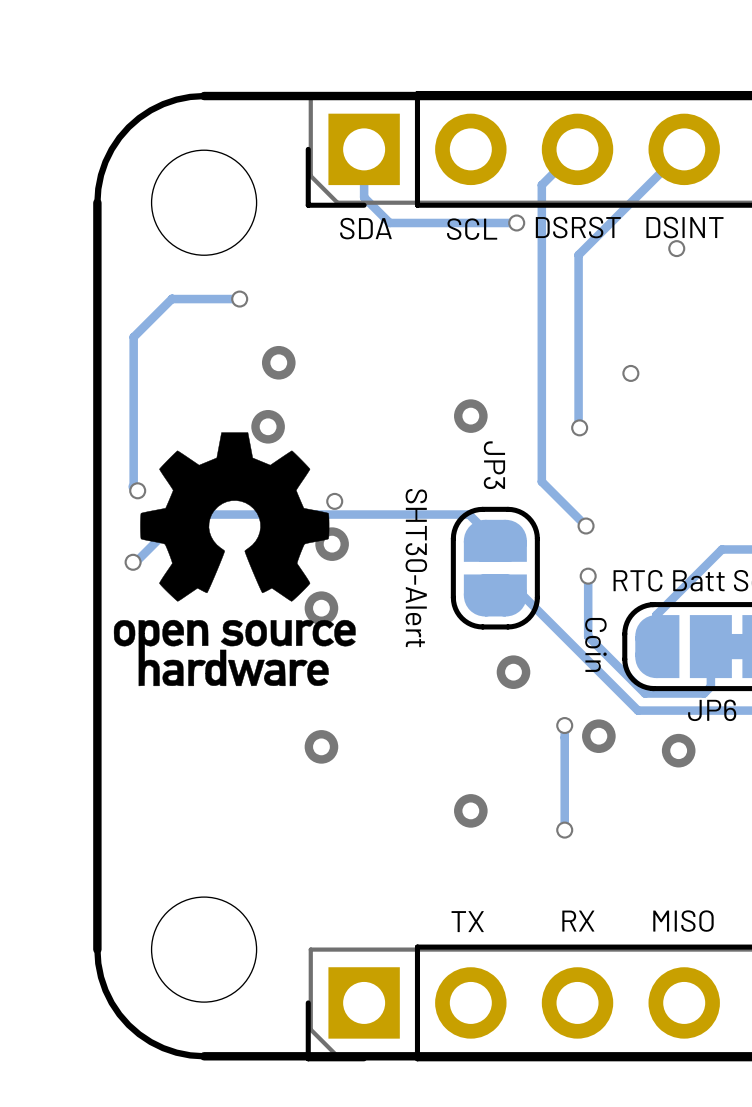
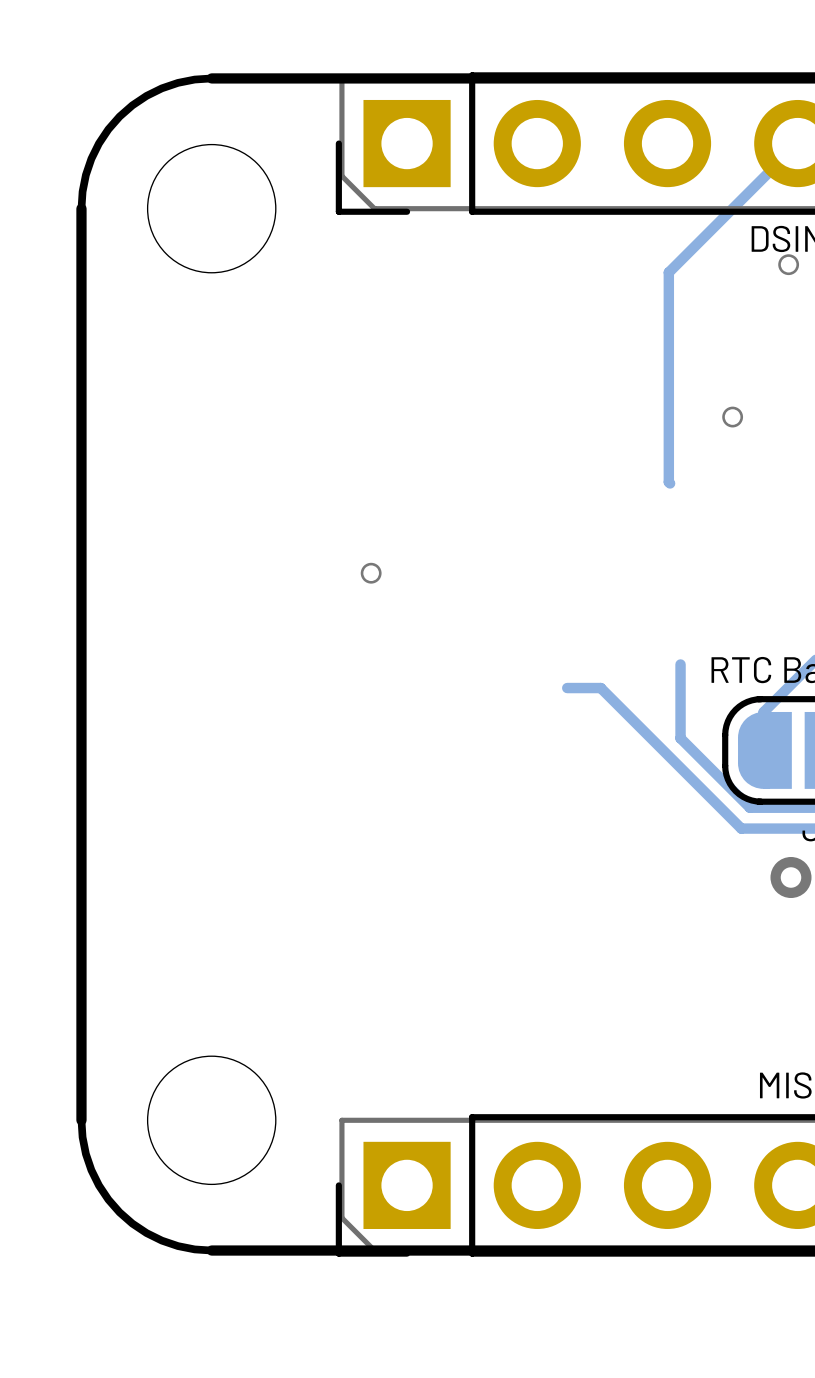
track: (364, 149) (364, 197) (389, 222) (516, 222) -> none
track: (577, 149) (541, 185) (541, 481) (586, 526) -> none
via: (516, 222) -> none
text: DSRST (578, 227) -> none
text: SDA (365, 228) -> none
text: SCL (472, 229) -> none
track: (172, 298) (133, 337) (133, 486) (137, 490) -> none
track: (239, 299) (172, 299) -> none
via: (239, 299) -> none
via: (278, 362) -> none
via: (470, 416) -> none
via: (268, 426) -> none
via: (579, 427) -> none
drawing: [113, 432, 356, 687] -> none
via: (137, 490) -> none
via: (586, 526) -> none
track: (495, 540) (469, 514) (183, 514) (135, 562) -> none
via: (332, 544) -> none
via: (133, 562) -> none
JP3: SHT30-Alert (495, 568) -> none
via: (588, 576) -> none
via: (321, 608) -> none
text: Coin (595, 644) -> none
via: (513, 672) -> none
track: (564, 725) (564, 830) -> none
via: (564, 725) -> none
via: (598, 736) -> none
via: (321, 746) -> none
via: (470, 810) -> none
via: (564, 830) -> none
text: TX (467, 921) -> none
text: RX (578, 921) -> none

